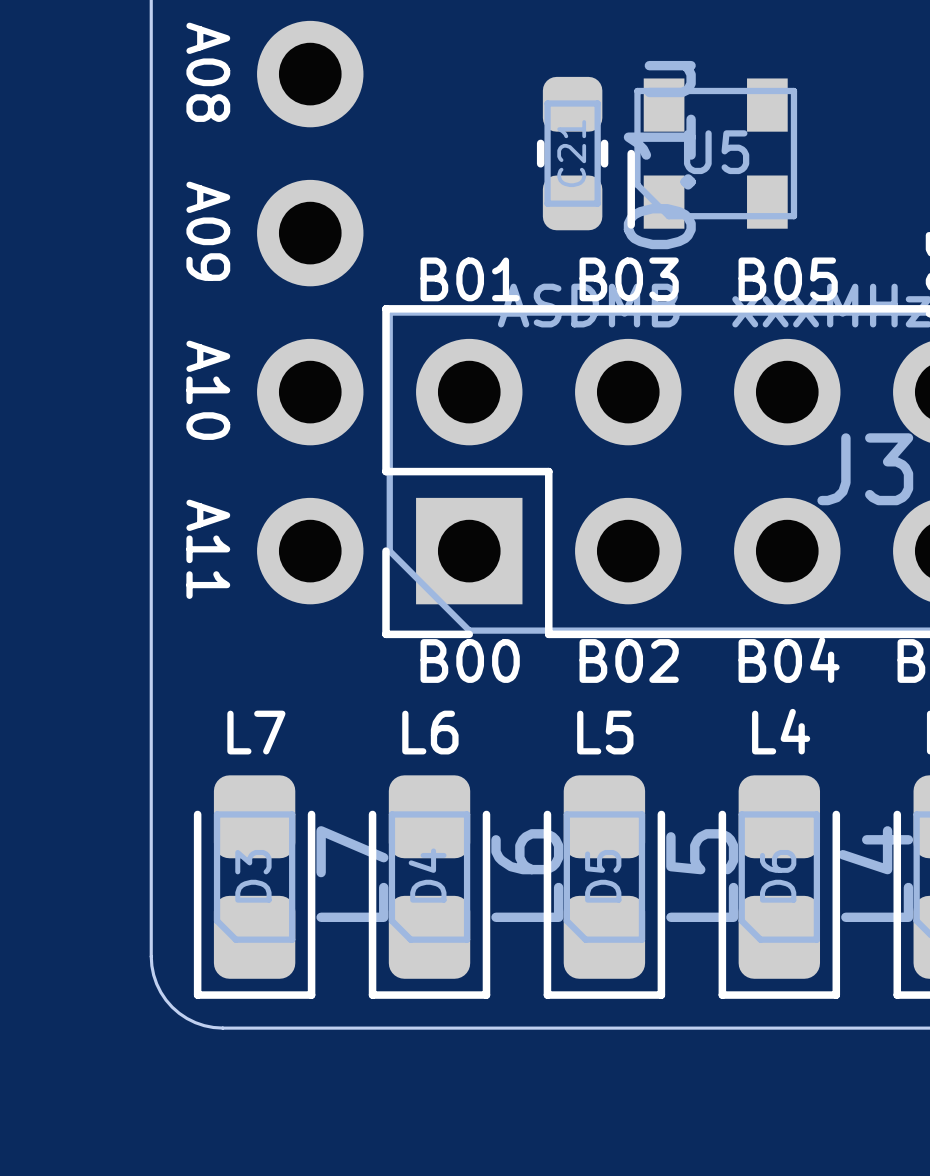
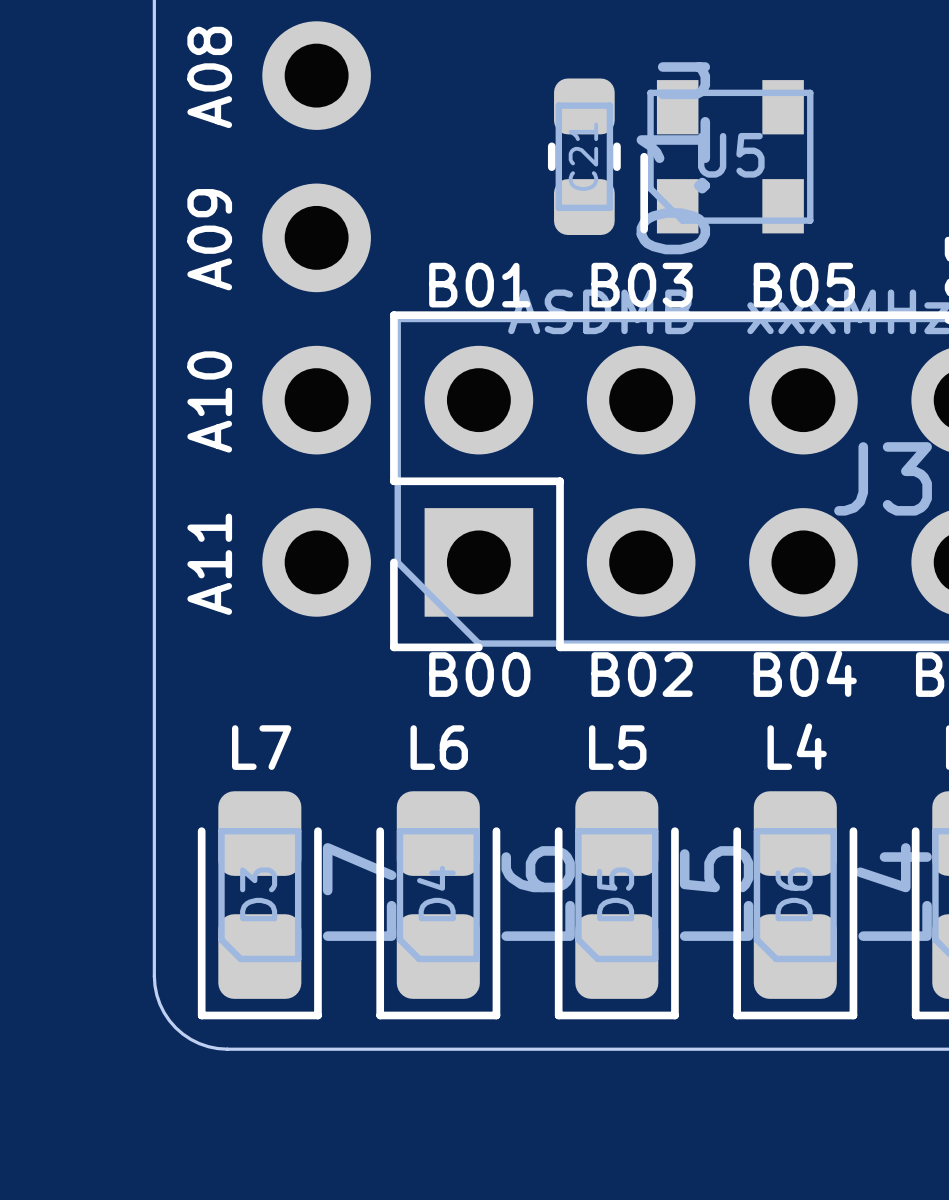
text rotation: 0° (208, 72) -> 180° (209, 77)
text rotation: 0° (208, 231) -> 180° (209, 239)
text rotation: 0° (208, 390) -> 180° (209, 401)
text rotation: 0° (208, 549) -> 180° (209, 564)

